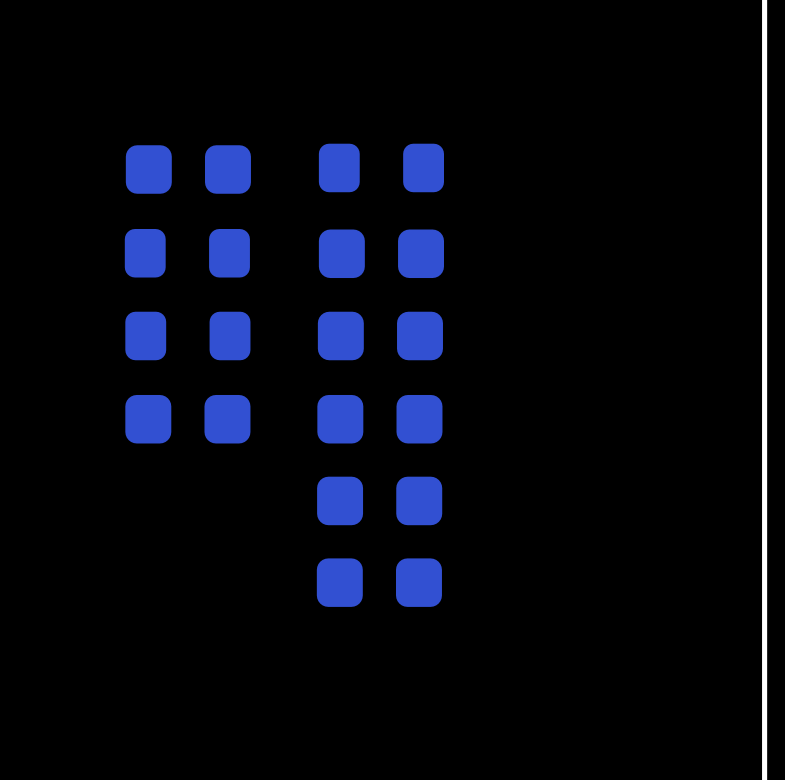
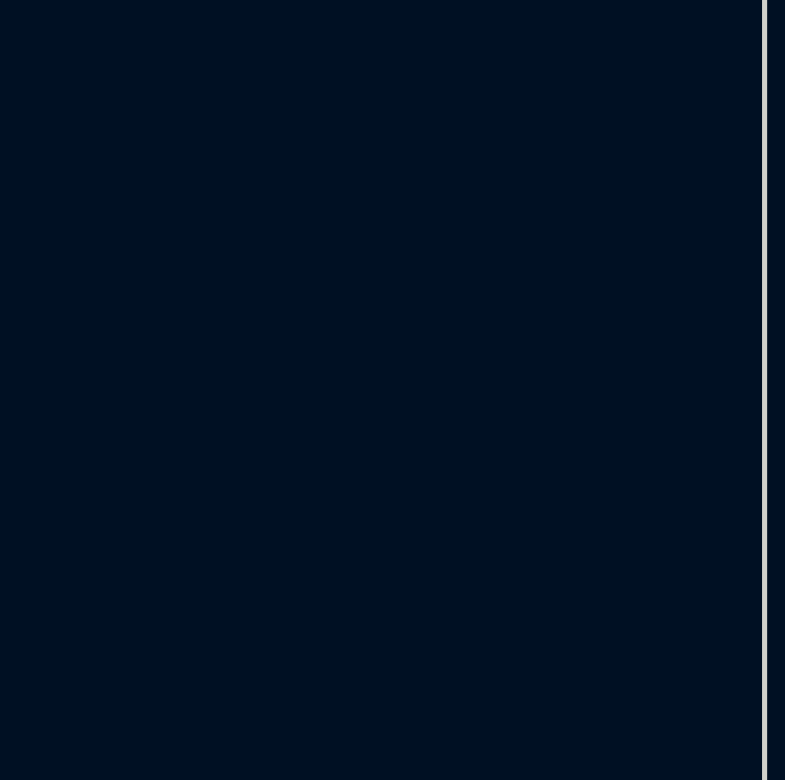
part: (381, 167) -> none
part: (188, 169) -> none
part: (187, 253) -> none
part: (381, 253) -> none
part: (187, 335) -> none
part: (380, 335) -> none
part: (187, 419) -> none
part: (379, 419) -> none
part: (379, 500) -> none
part: (379, 582) -> none

